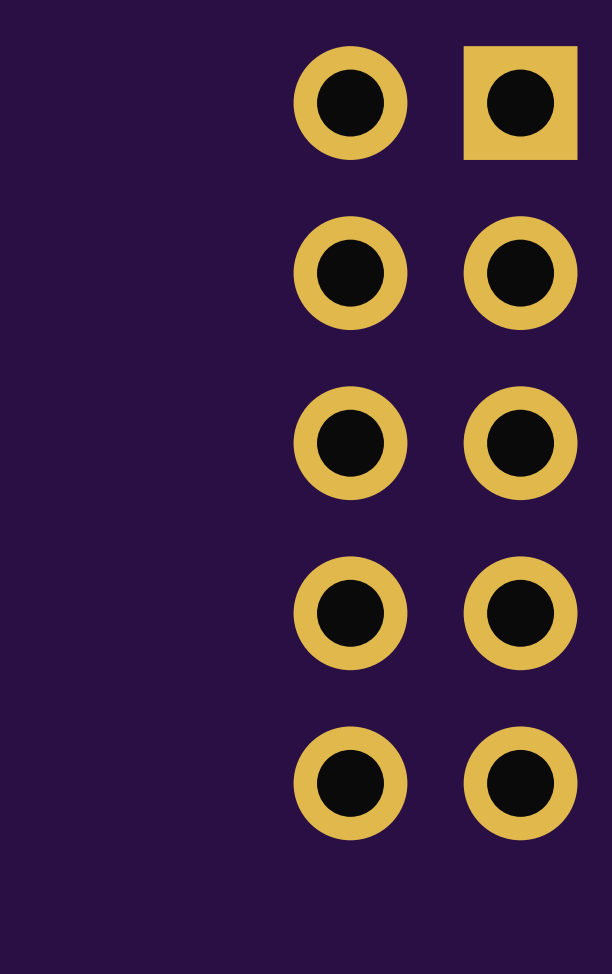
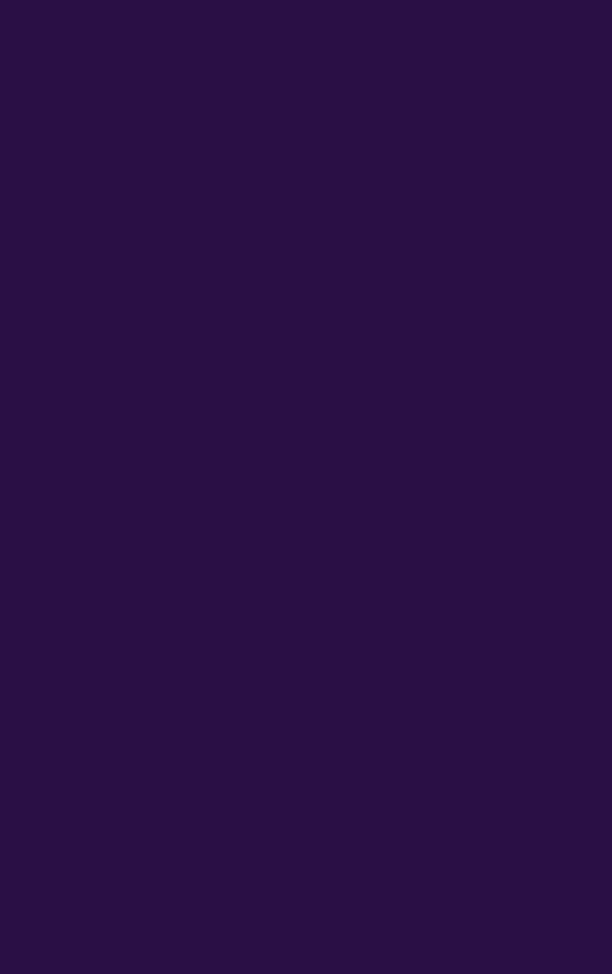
part: (435, 443) -> none

